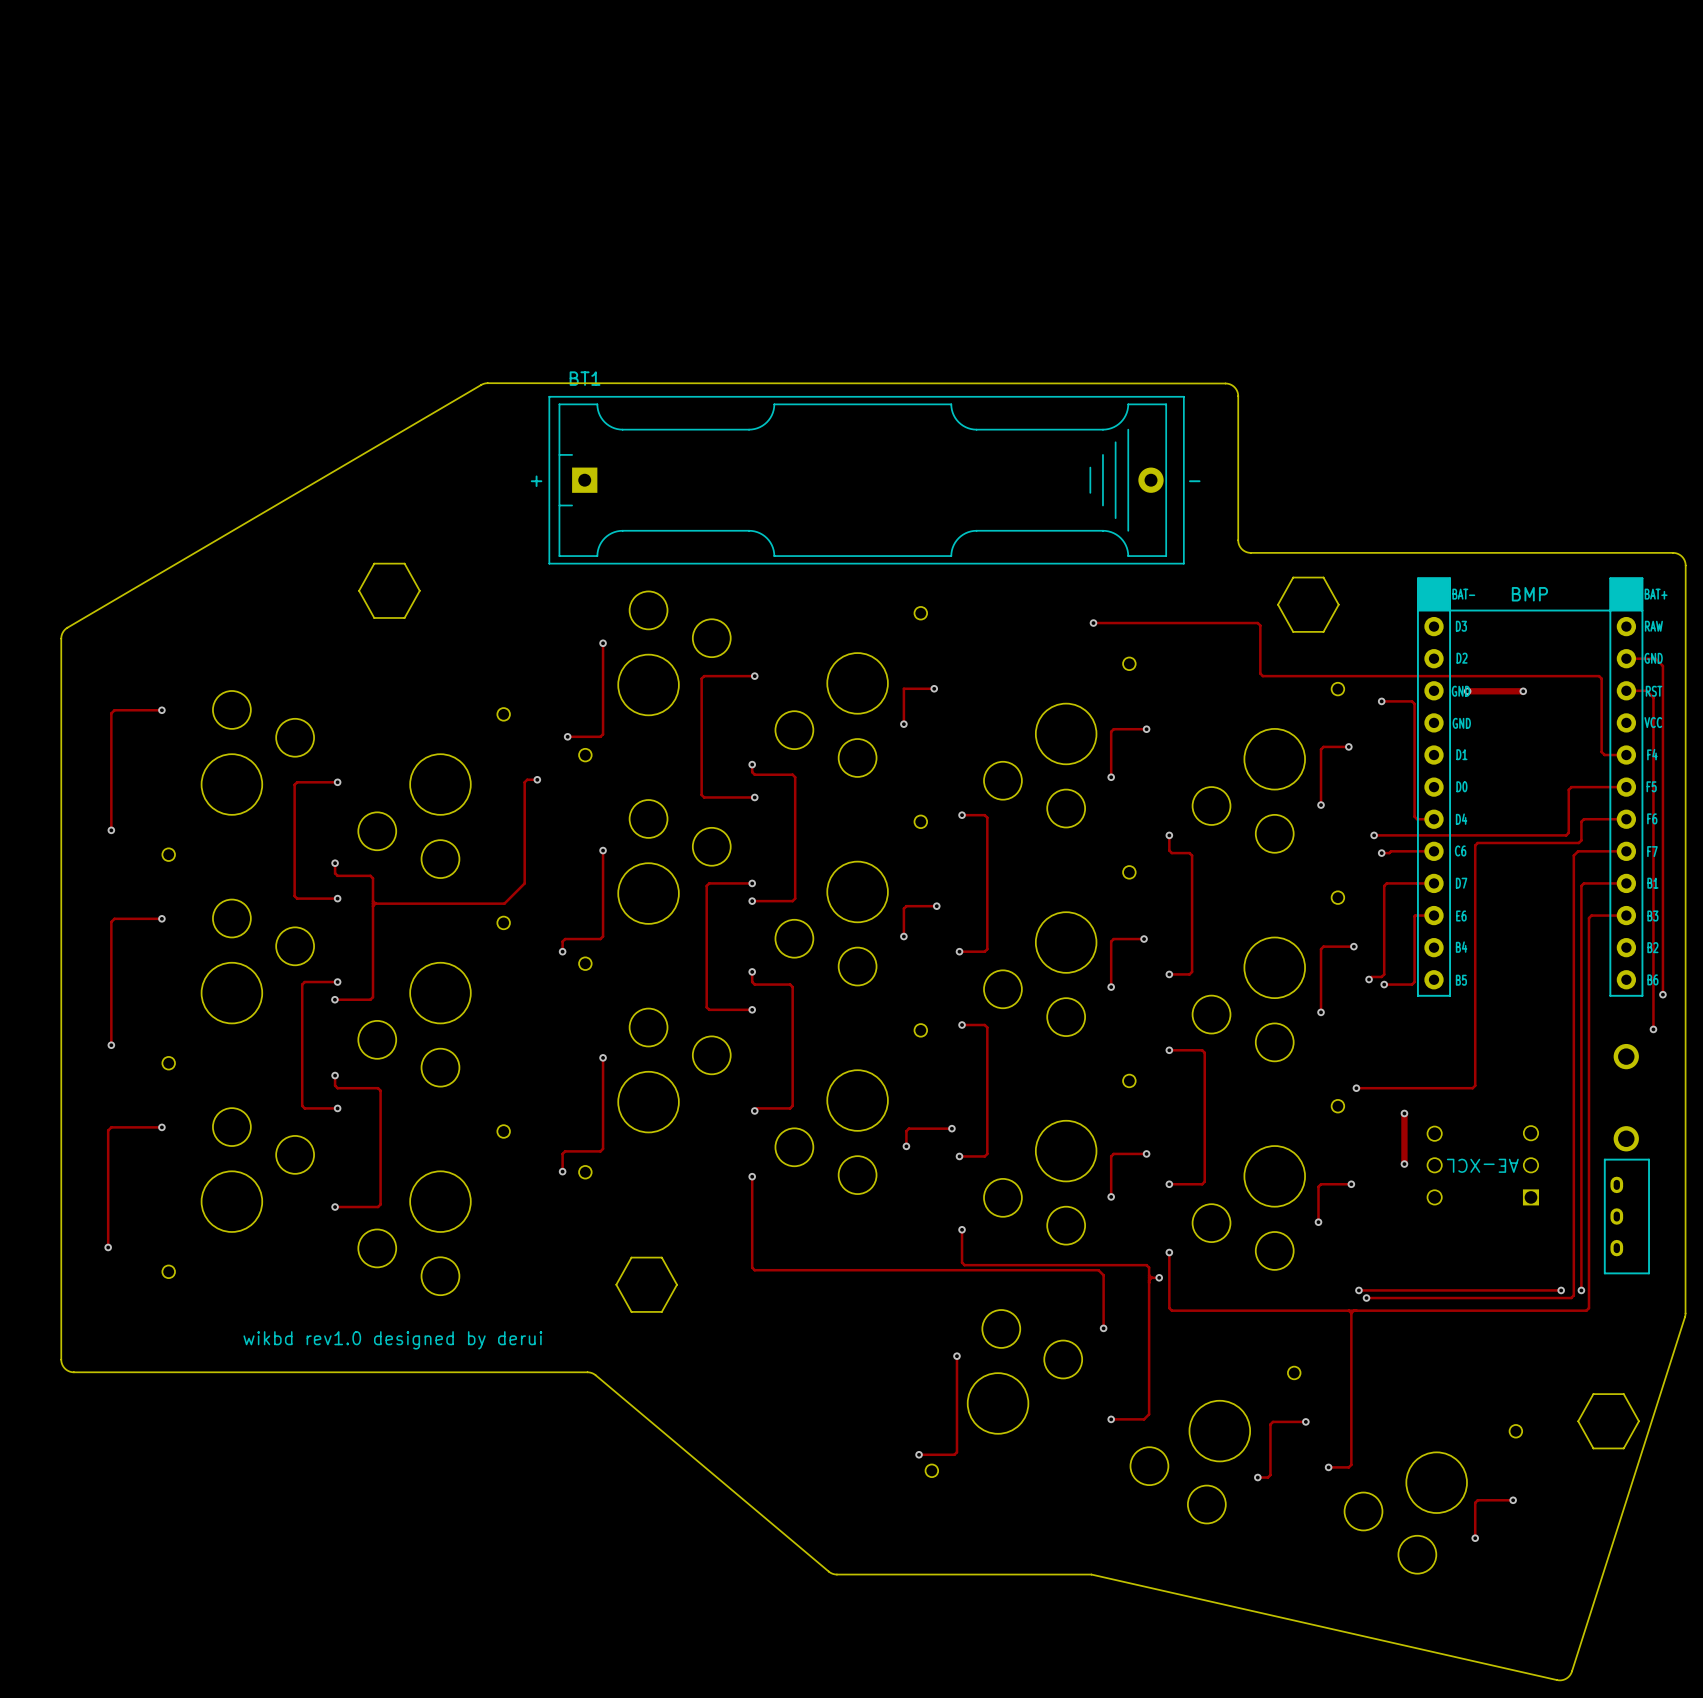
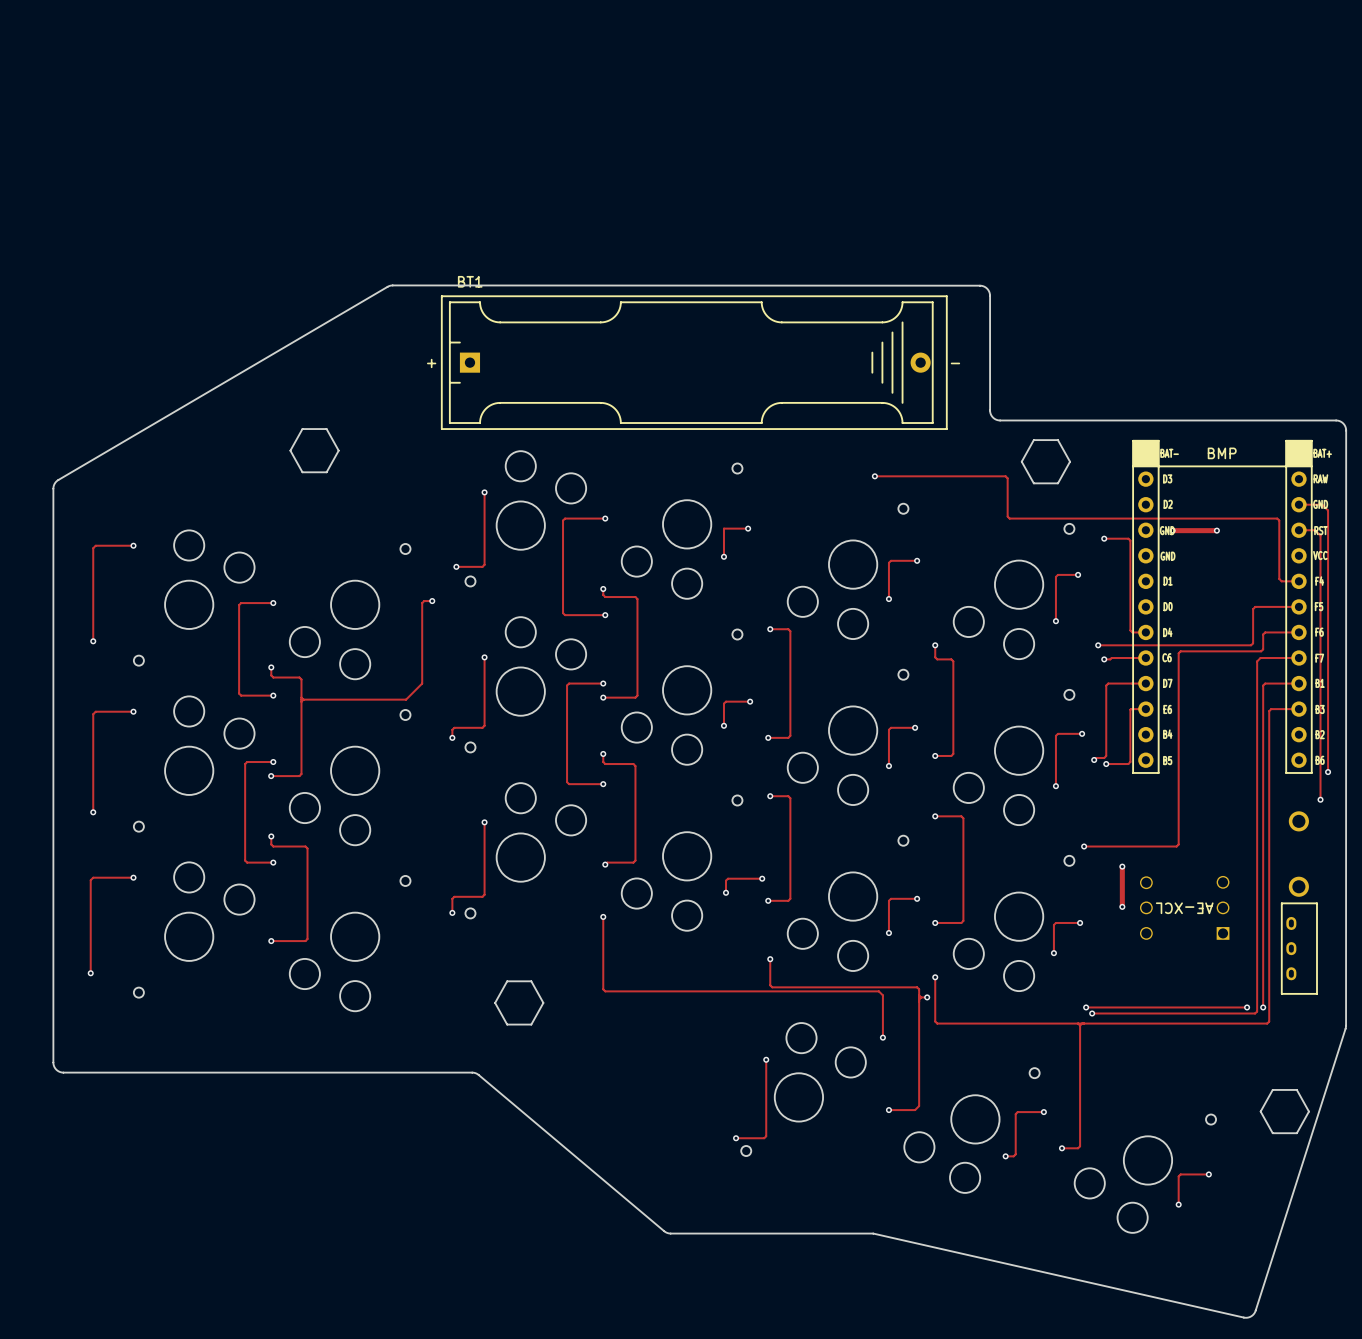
text: wikbd rev1.0 designed by derui (392, 1340) -> none

